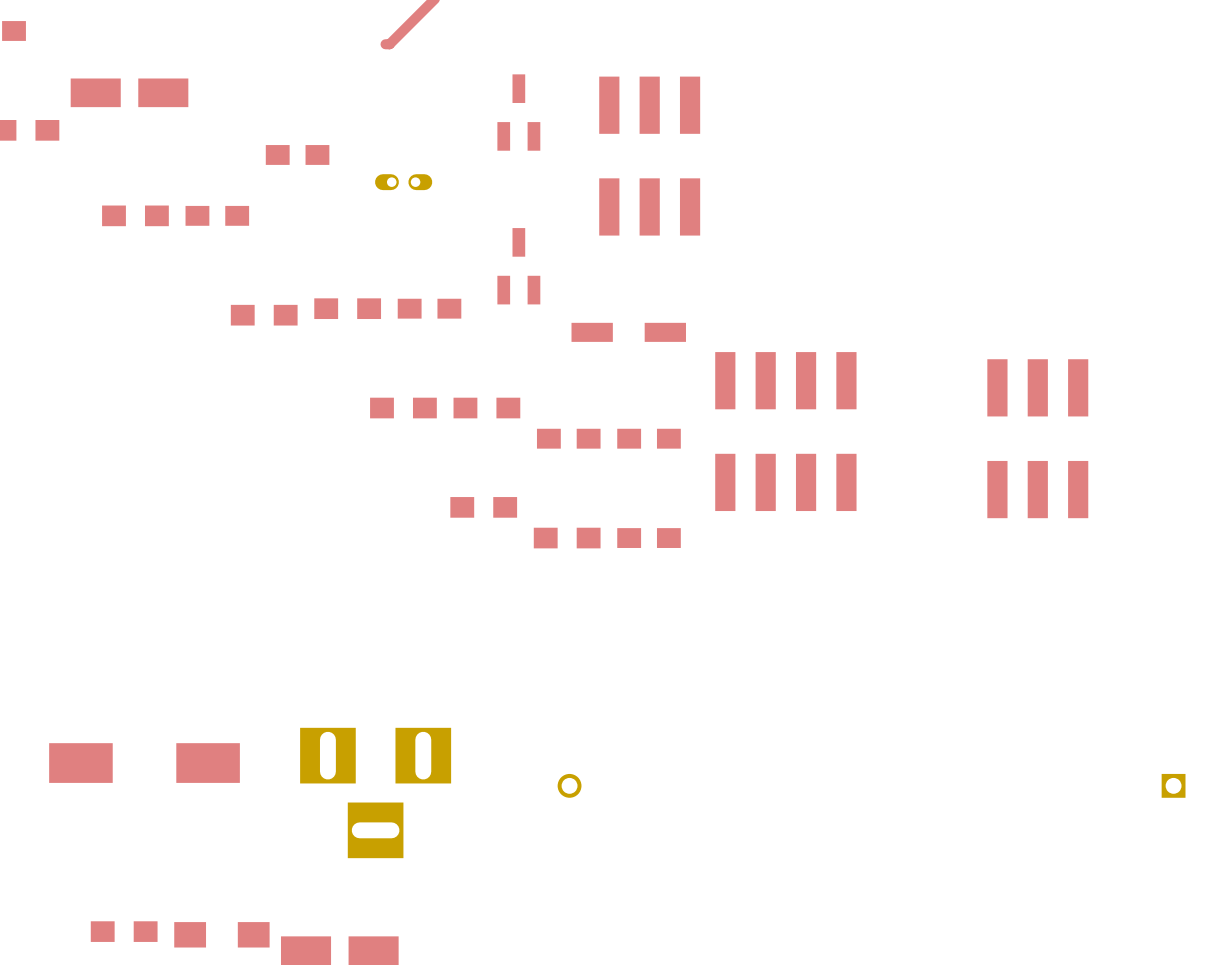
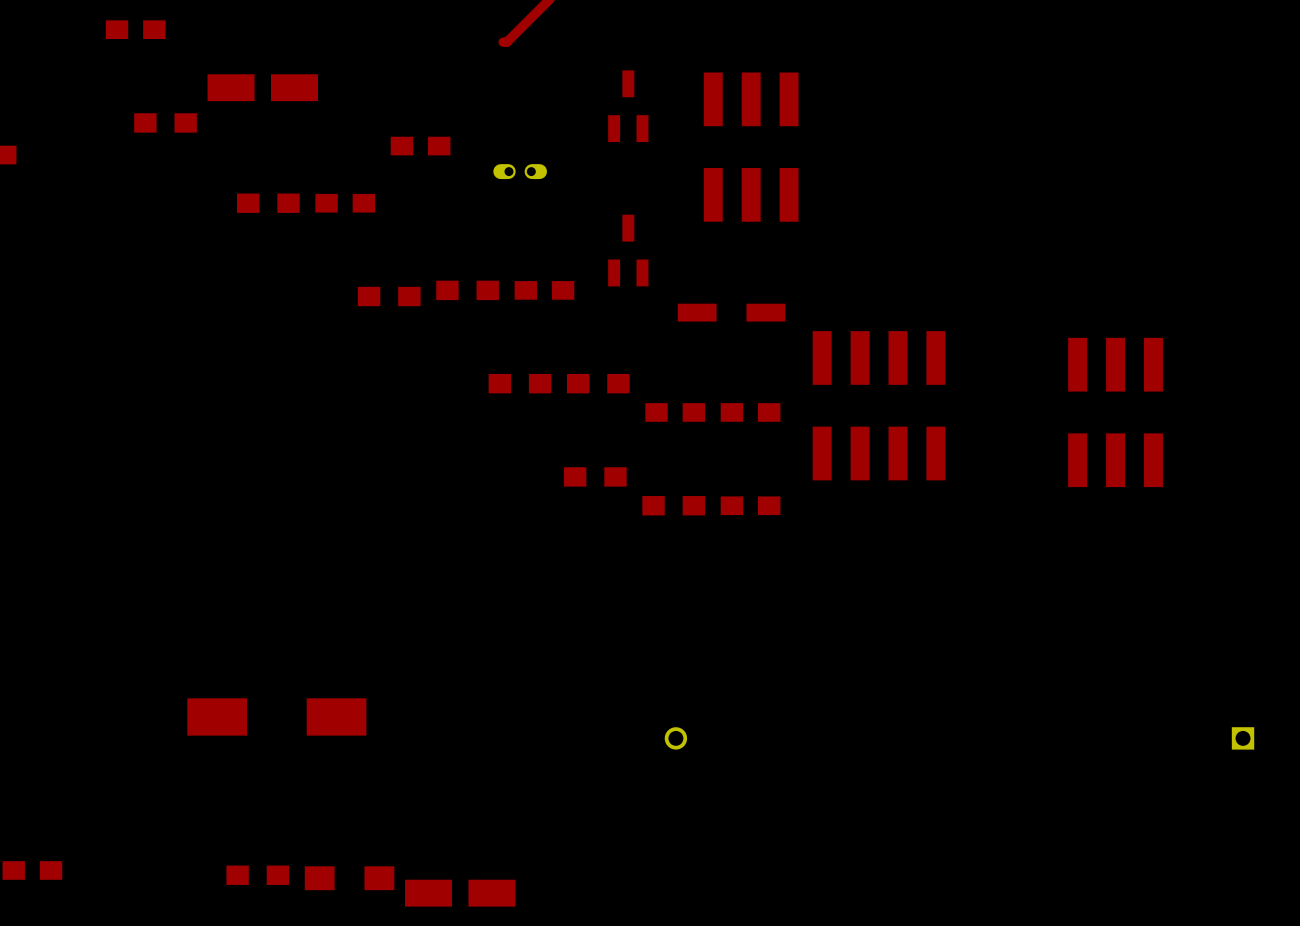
part: (375, 792) -> none

